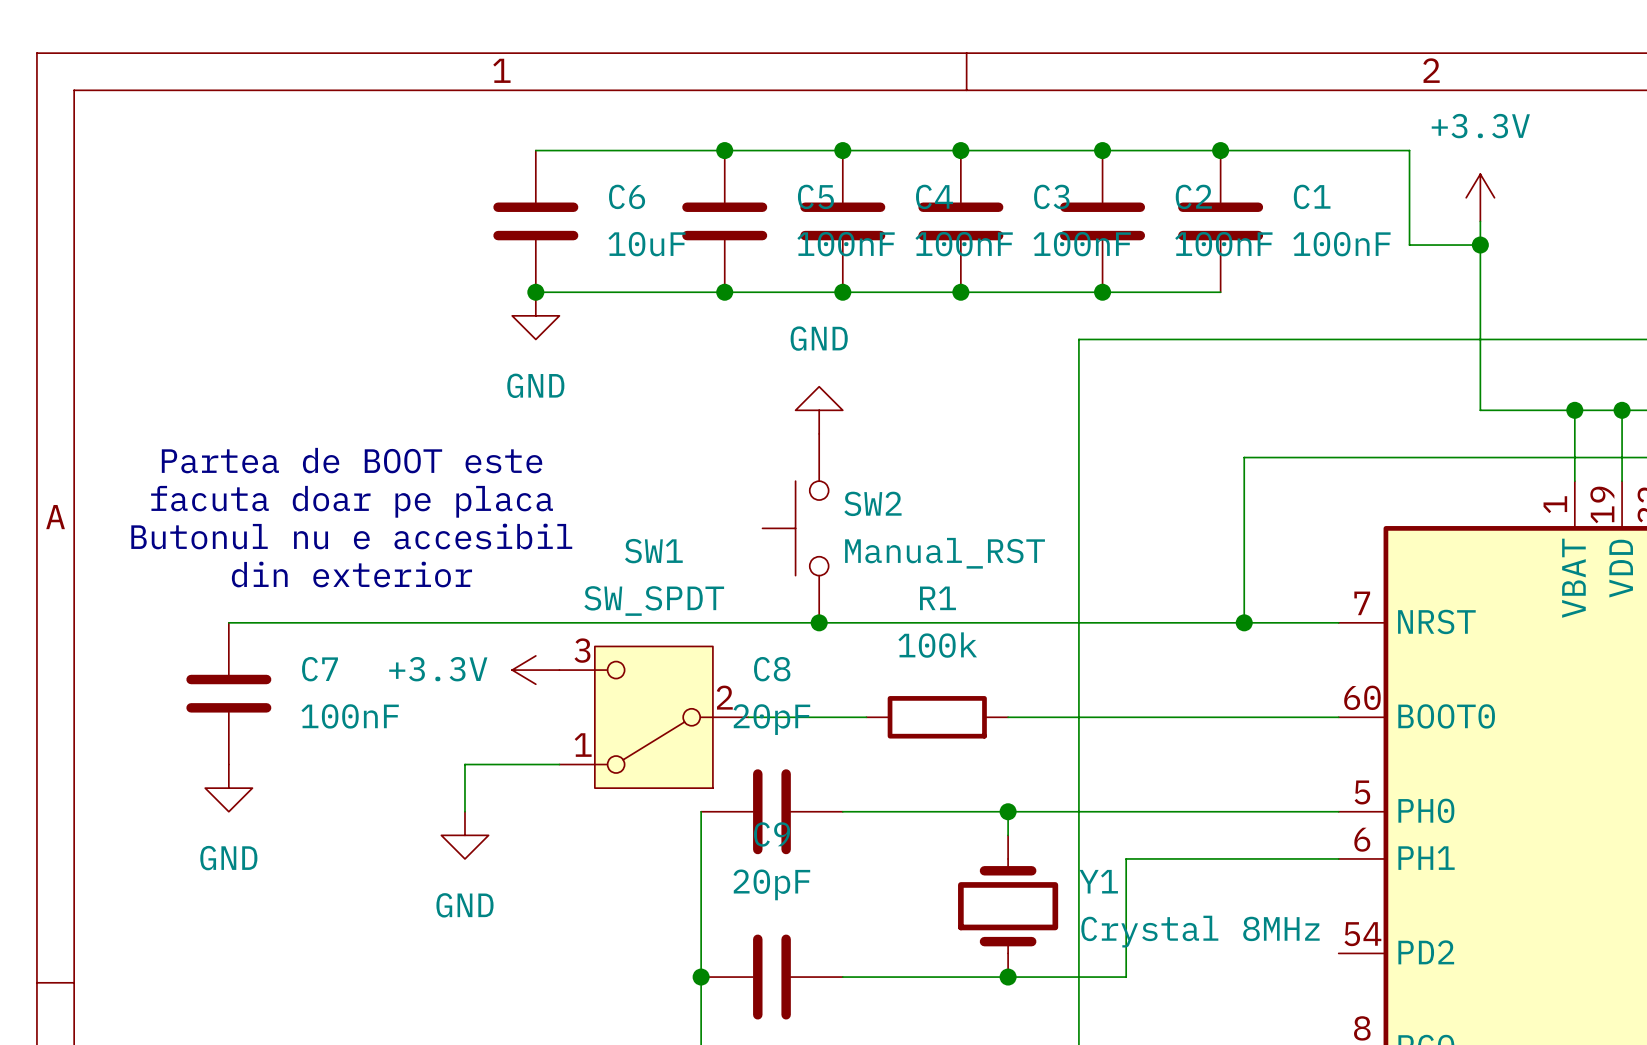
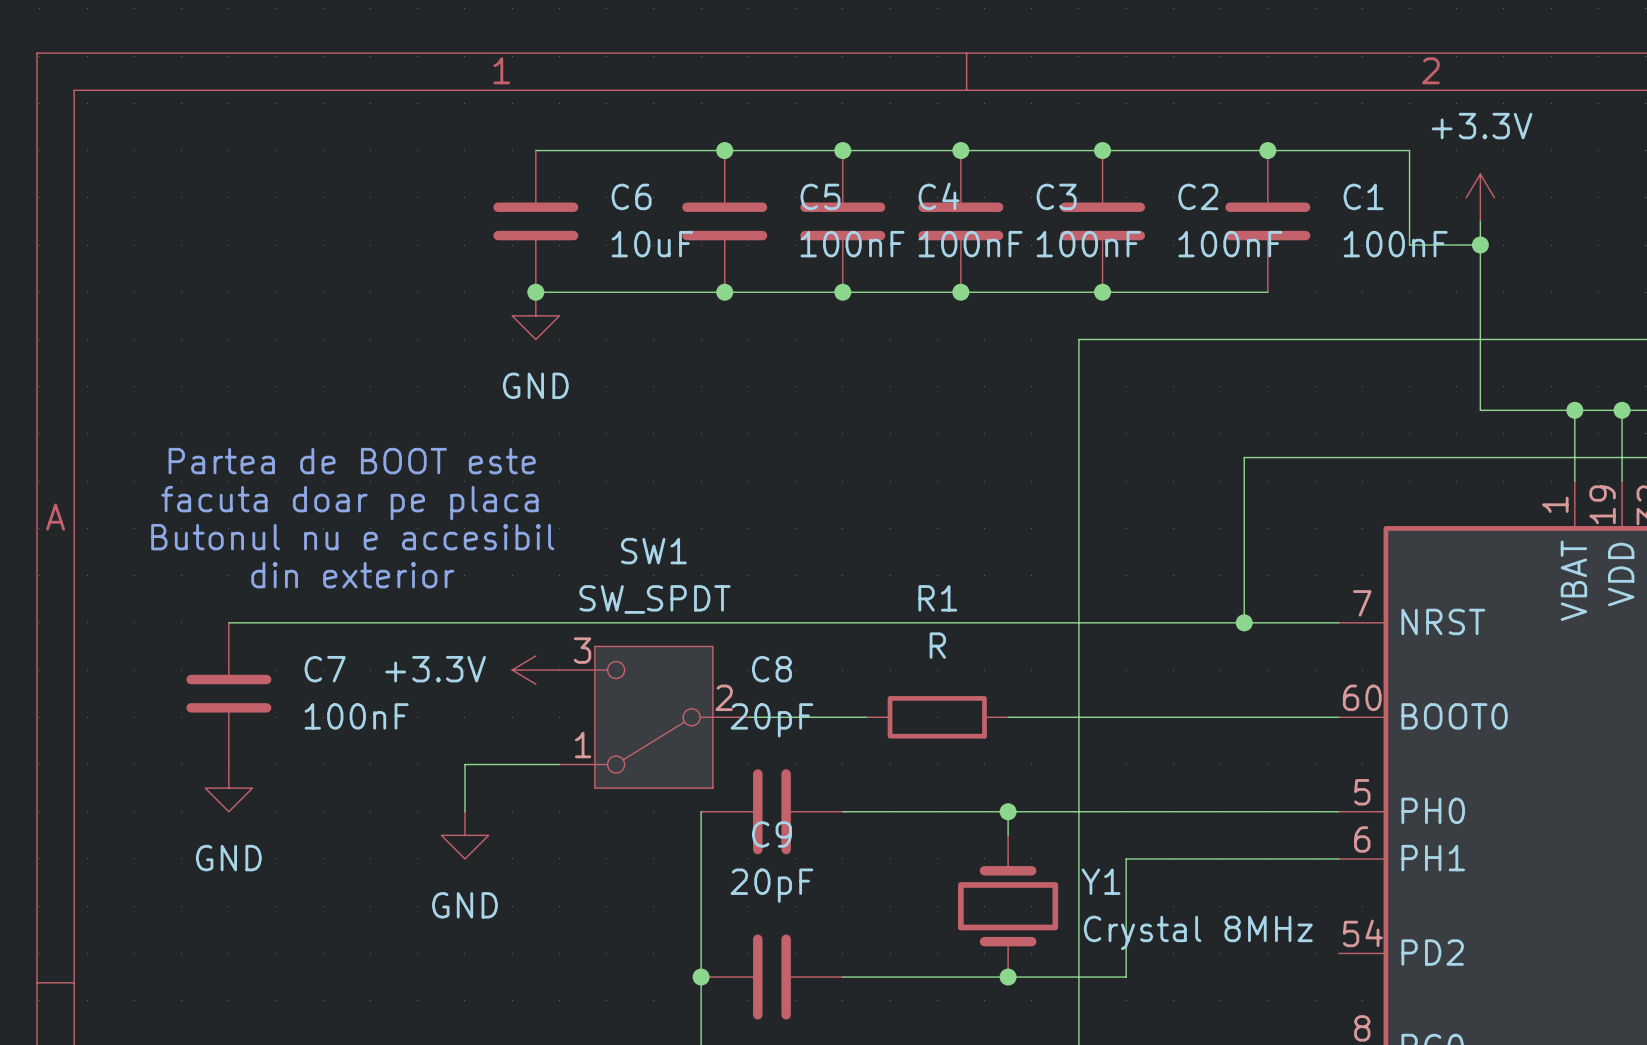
junction position: (1220, 150) -> (1267, 150)
C1 position: (1220, 221) -> (1267, 221)
wire: none -> (1220, 292) (1267, 292)
power symbol: GND (819, 410) -> none
SW2: Manual_RST (795, 528) -> none
junction: (819, 622) -> none
R1 value: 100k (937, 645) -> R (937, 645)

